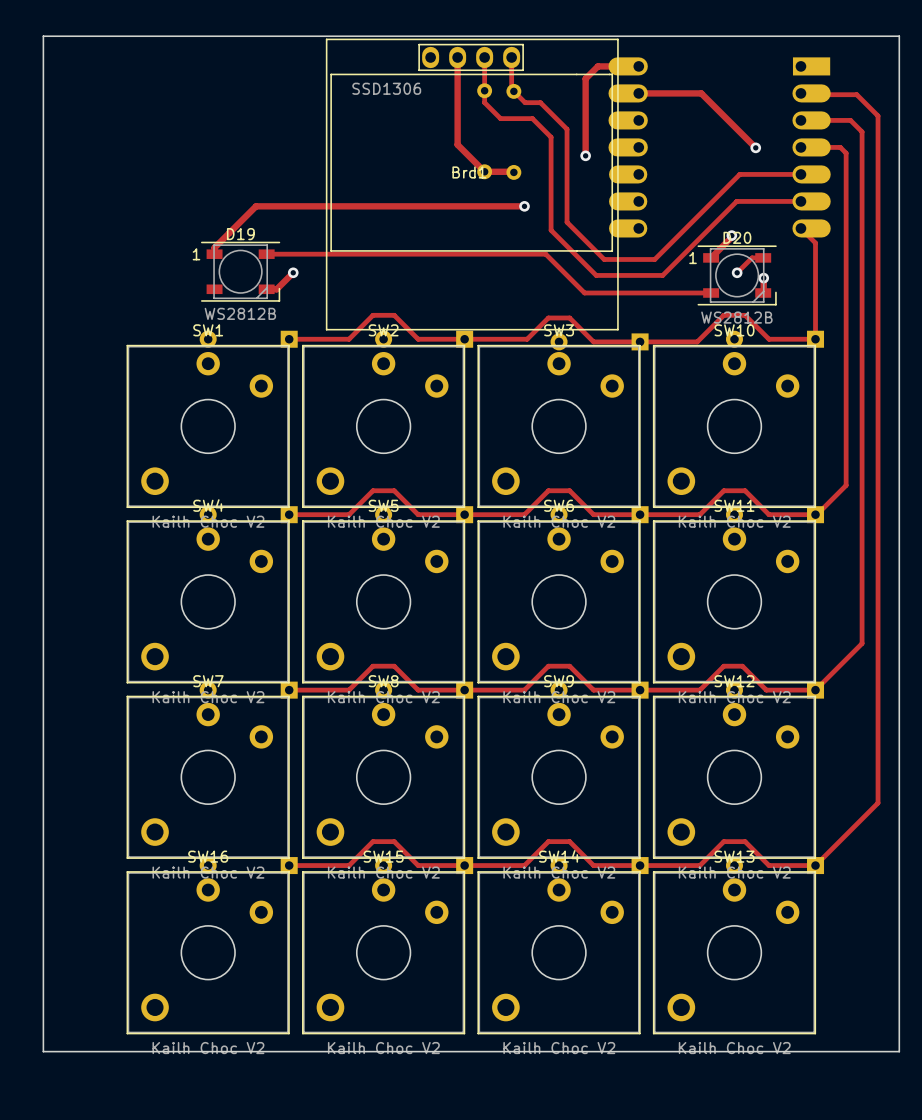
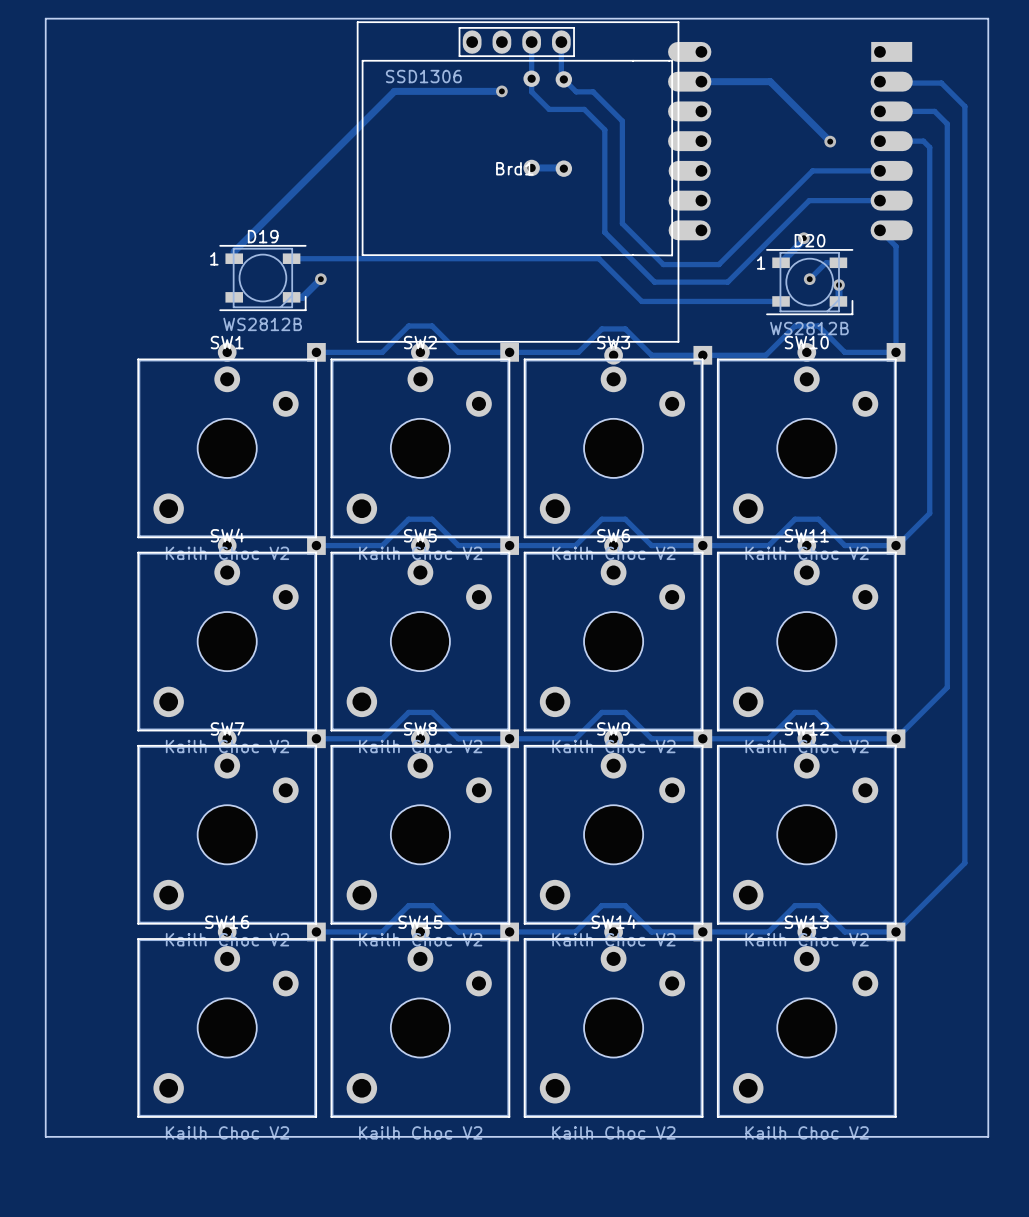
track: (457, 57) (457, 144) (484, 171) -> none
track: (638, 66) (597, 66) (585, 78) (585, 155) -> none
via: none -> (501, 91)
via: (585, 155) -> none
track: (256, 206) (524, 206) -> (279, 206) (394, 91) (501, 91)
via: (524, 206) -> none

